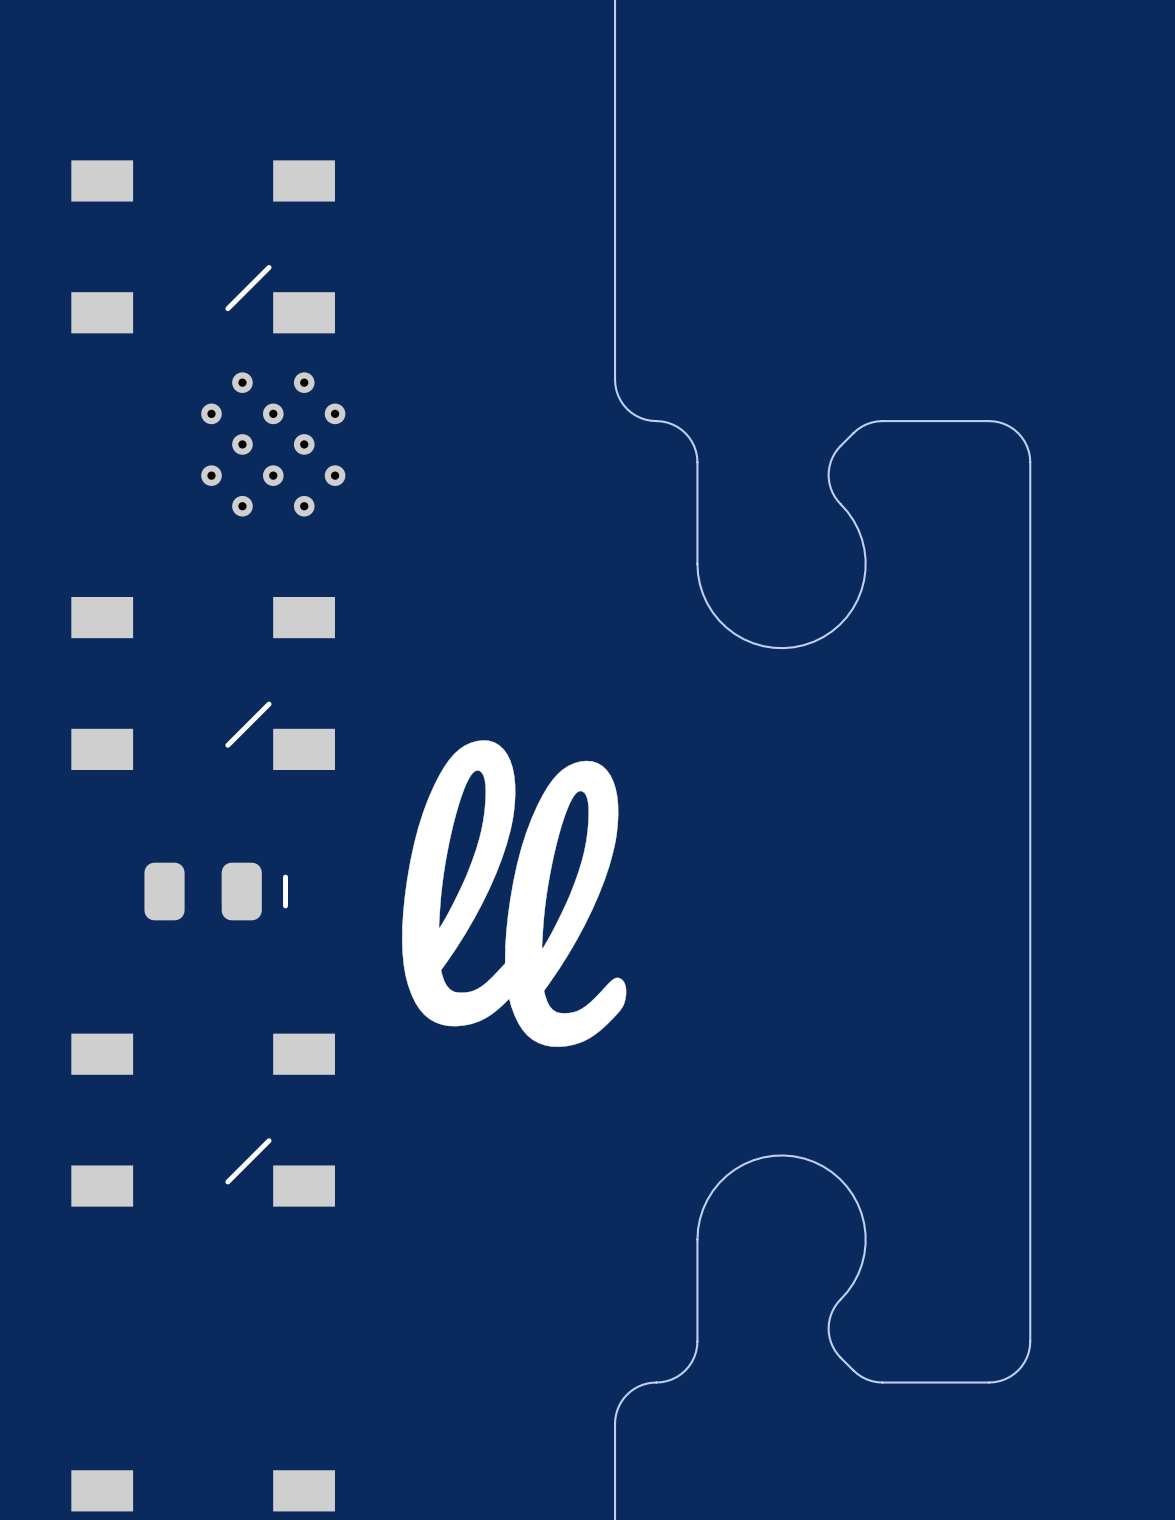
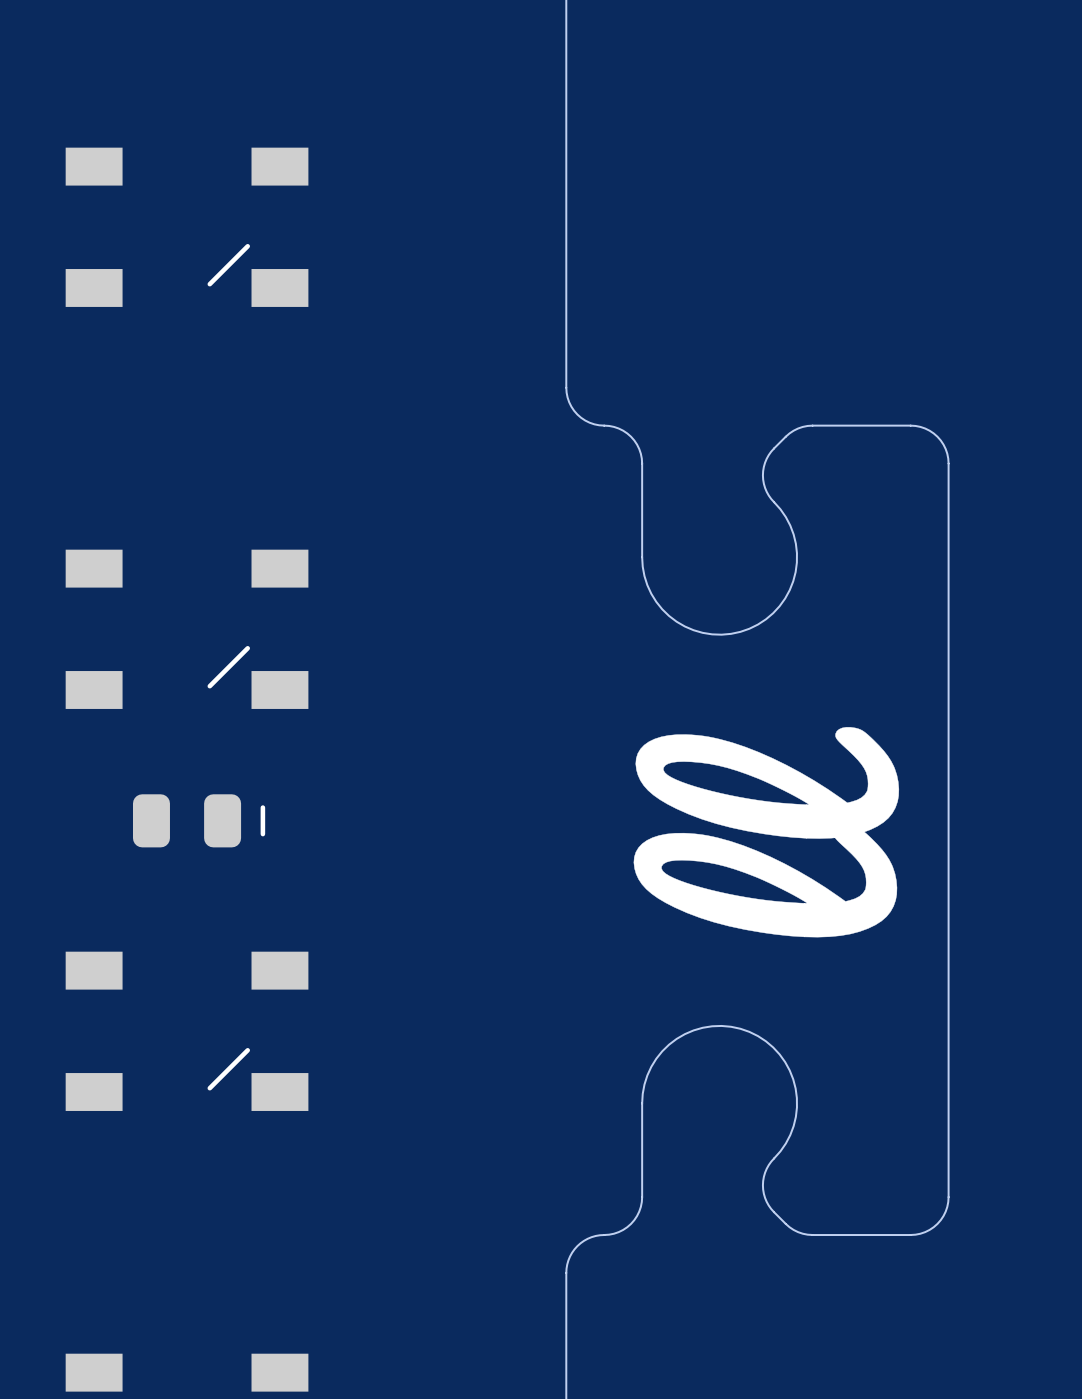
board edge: (615, 379) (620, 400) (631, 412) (645, 419) (672, 424) (685, 433) (691, 441) (697, 456) (697, 503) -> (566, 349) (566, 392) (571, 406) (581, 417) (589, 422) (614, 426) (627, 433) (637, 444) (642, 463)
part: (273, 444) -> none
board edge: (1030, 503) (1028, 451) (1021, 437) (1009, 426) (989, 421) (877, 421) (866, 424) (853, 433) (837, 449) (829, 465) (828, 479) (830, 488) (858, 529) (865, 559) (864, 580) (857, 599) (846, 617) (831, 631) (813, 641) (783, 648) (763, 646) (743, 639) (726, 627) (712, 612) (699, 584) (697, 564) -> (948, 463) (947, 453) (940, 440) (929, 430) (915, 425) (812, 425) (798, 428) (789, 433) (768, 455) (762, 475) (766, 491) (785, 517) (793, 534) (796, 562) (793, 581) (779, 606) (765, 619) (749, 628) (731, 633) (712, 634) (693, 630) (669, 615) (656, 601) (647, 585) (642, 566) (642, 519)
drawing: [402, 740, 627, 1047] -> none
drawing: none -> [633, 727, 900, 938]
board edge: (697, 1239) (699, 1219) (707, 1199) (719, 1183) (743, 1164) (763, 1157) (783, 1155) (804, 1158) (831, 1172) (846, 1186) (857, 1203) (864, 1223) (865, 1244) (858, 1273) (830, 1314) (828, 1328) (829, 1337) (837, 1354) (853, 1370) (861, 1377) (877, 1382) (989, 1382) (1009, 1377) (1021, 1366) (1028, 1352) (1030, 1300) -> (642, 1141) (642, 1093) (647, 1075) (656, 1058) (669, 1044) (684, 1034) (712, 1026) (731, 1026) (757, 1036) (773, 1047) (785, 1062) (793, 1079) (796, 1097) (793, 1126) (785, 1143) (766, 1168) (762, 1185) (768, 1205) (789, 1227) (798, 1232) (812, 1235) (915, 1234) (929, 1229) (940, 1220) (947, 1206) (948, 1197)
board edge: (697, 1300) (697, 1346) (691, 1361) (685, 1370) (672, 1379) (642, 1384) (630, 1391) (619, 1405) (615, 1423) -> (642, 1197) (637, 1216) (627, 1227) (614, 1233) (587, 1238) (572, 1252) (566, 1268) (566, 1310)

